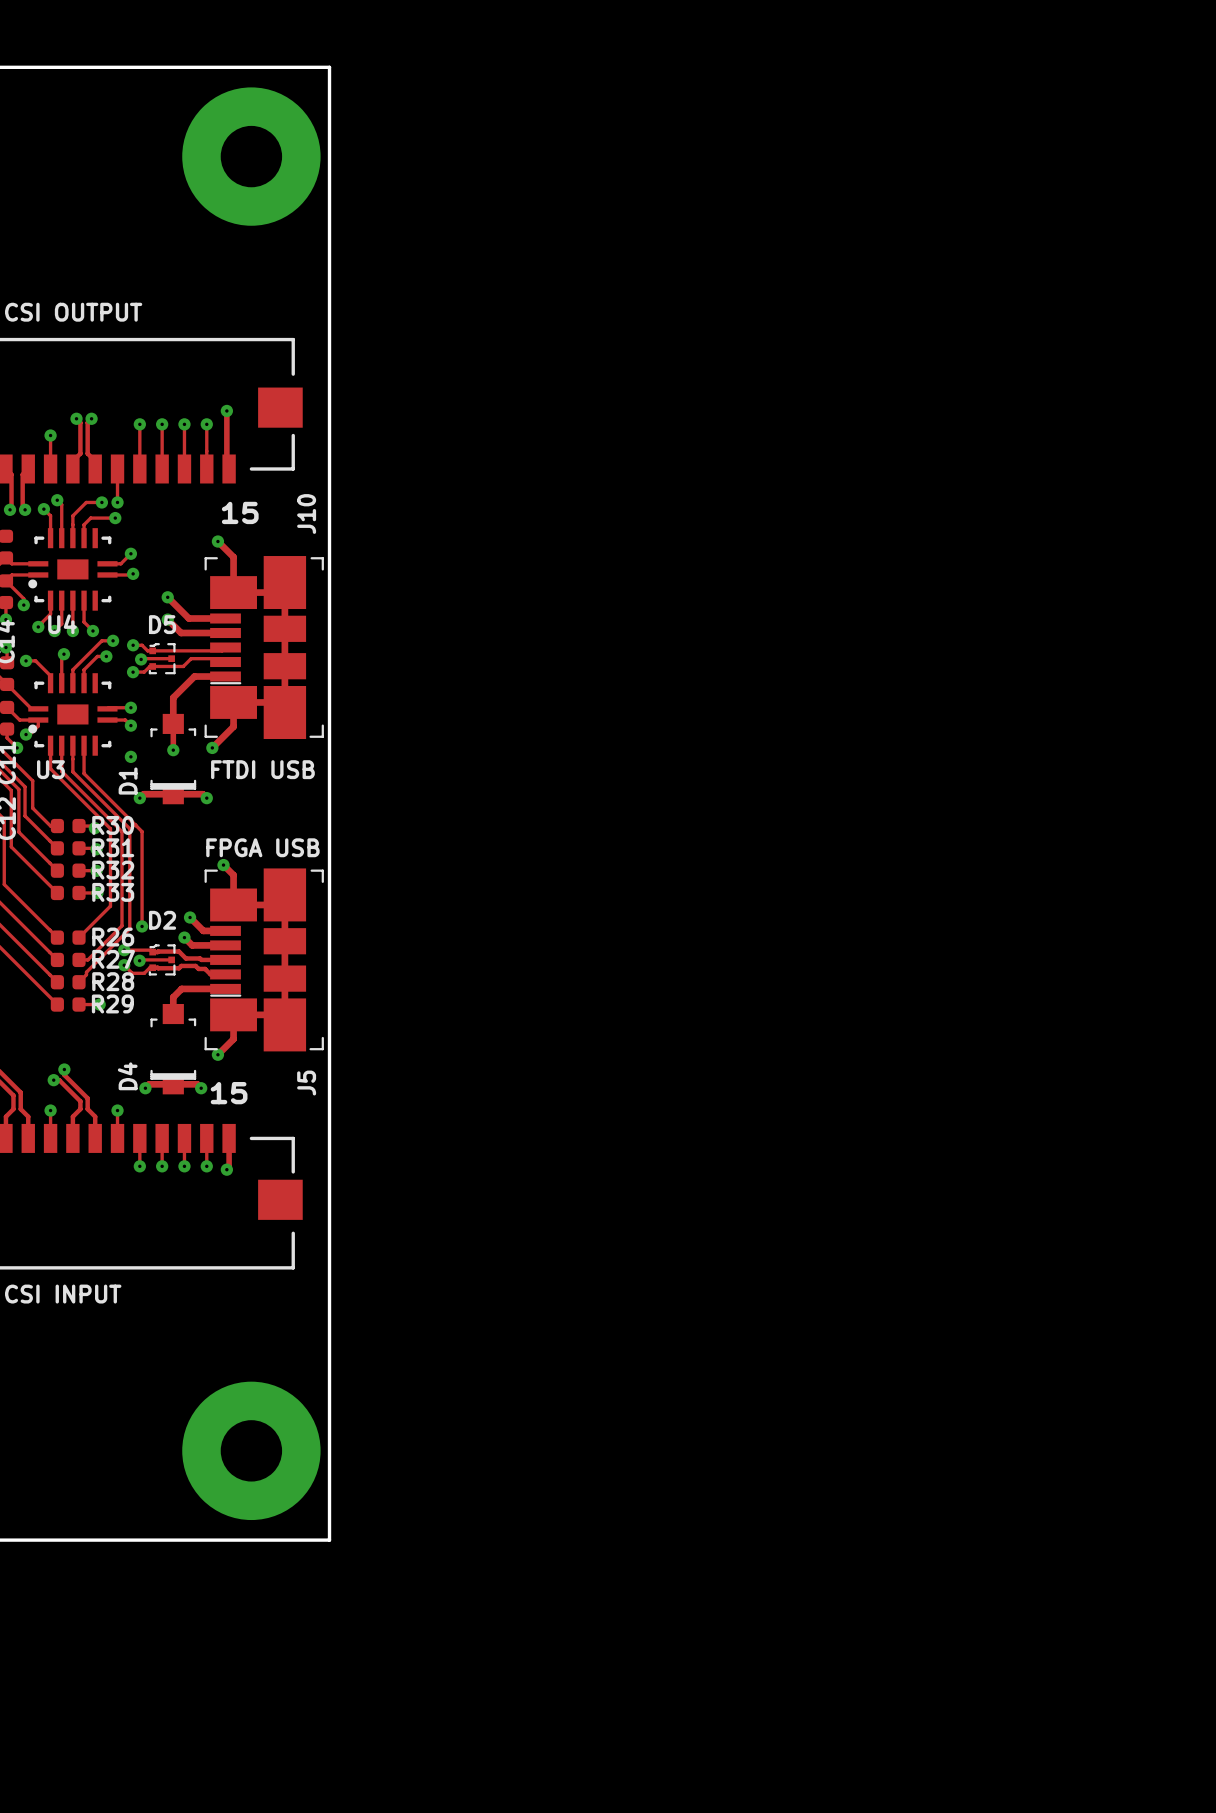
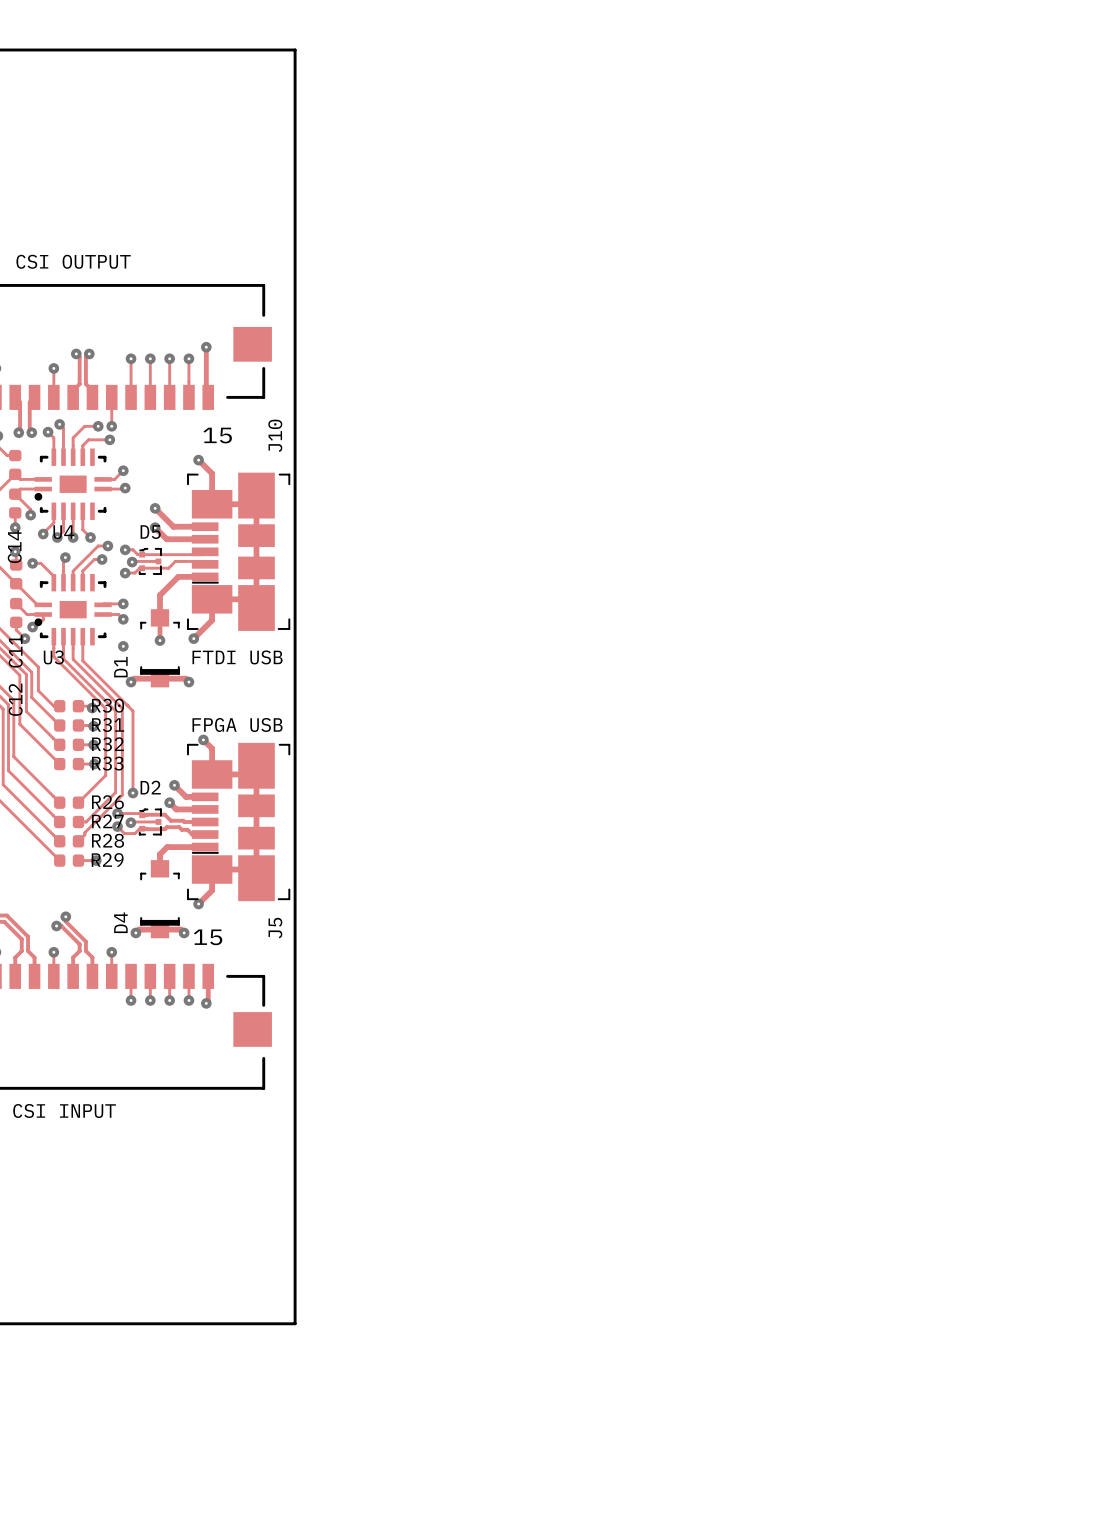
part: (251, 156) -> none
part: (251, 1450) -> none

